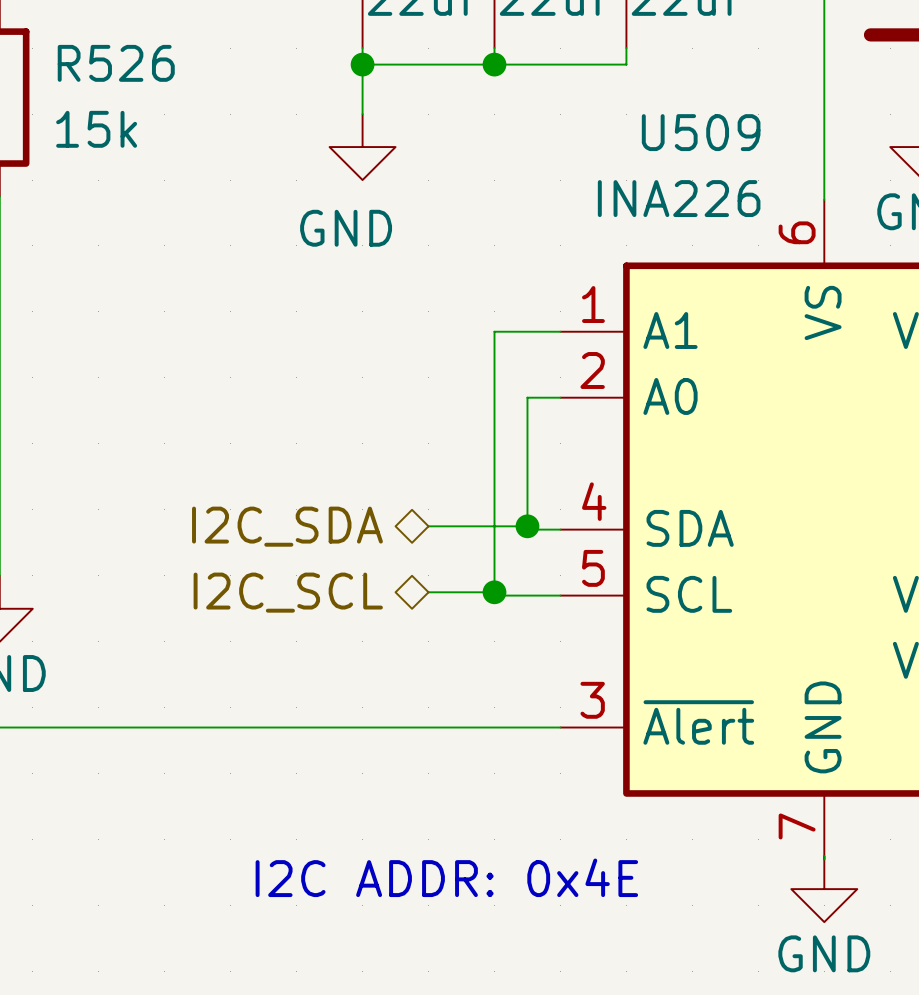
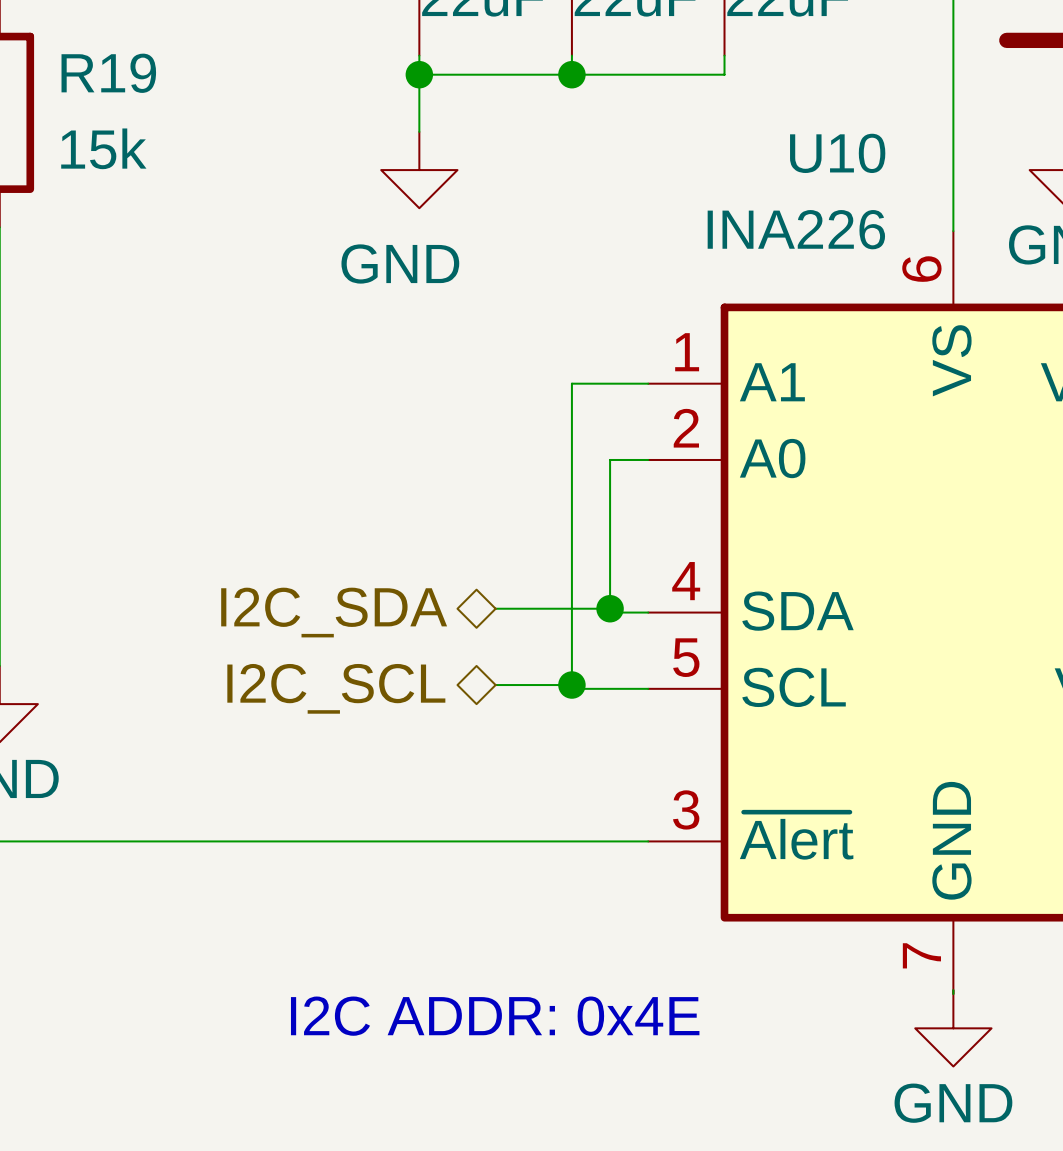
R526 name: R526 (116, 63) -> R19 (108, 73)
U509 name: U509 (701, 132) -> U10 (837, 153)

